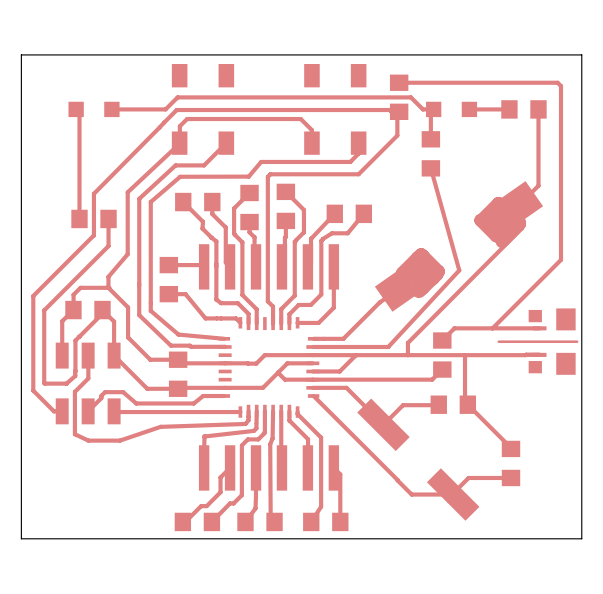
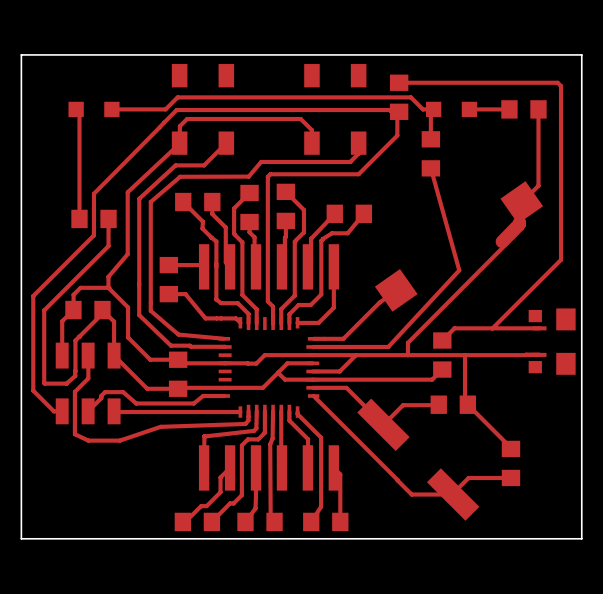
top track: (517, 217) (514, 217) (496, 235) (480, 220) (498, 203) (507, 212) (495, 223) -> none
top track: (426, 277) (423, 274) (423, 256) (438, 271) (419, 291) -> none
top track: (408, 279) (402, 273) (417, 258) (421, 254) (417, 257) (417, 291) -> none
top track: (577, 341) (498, 341) -> none

